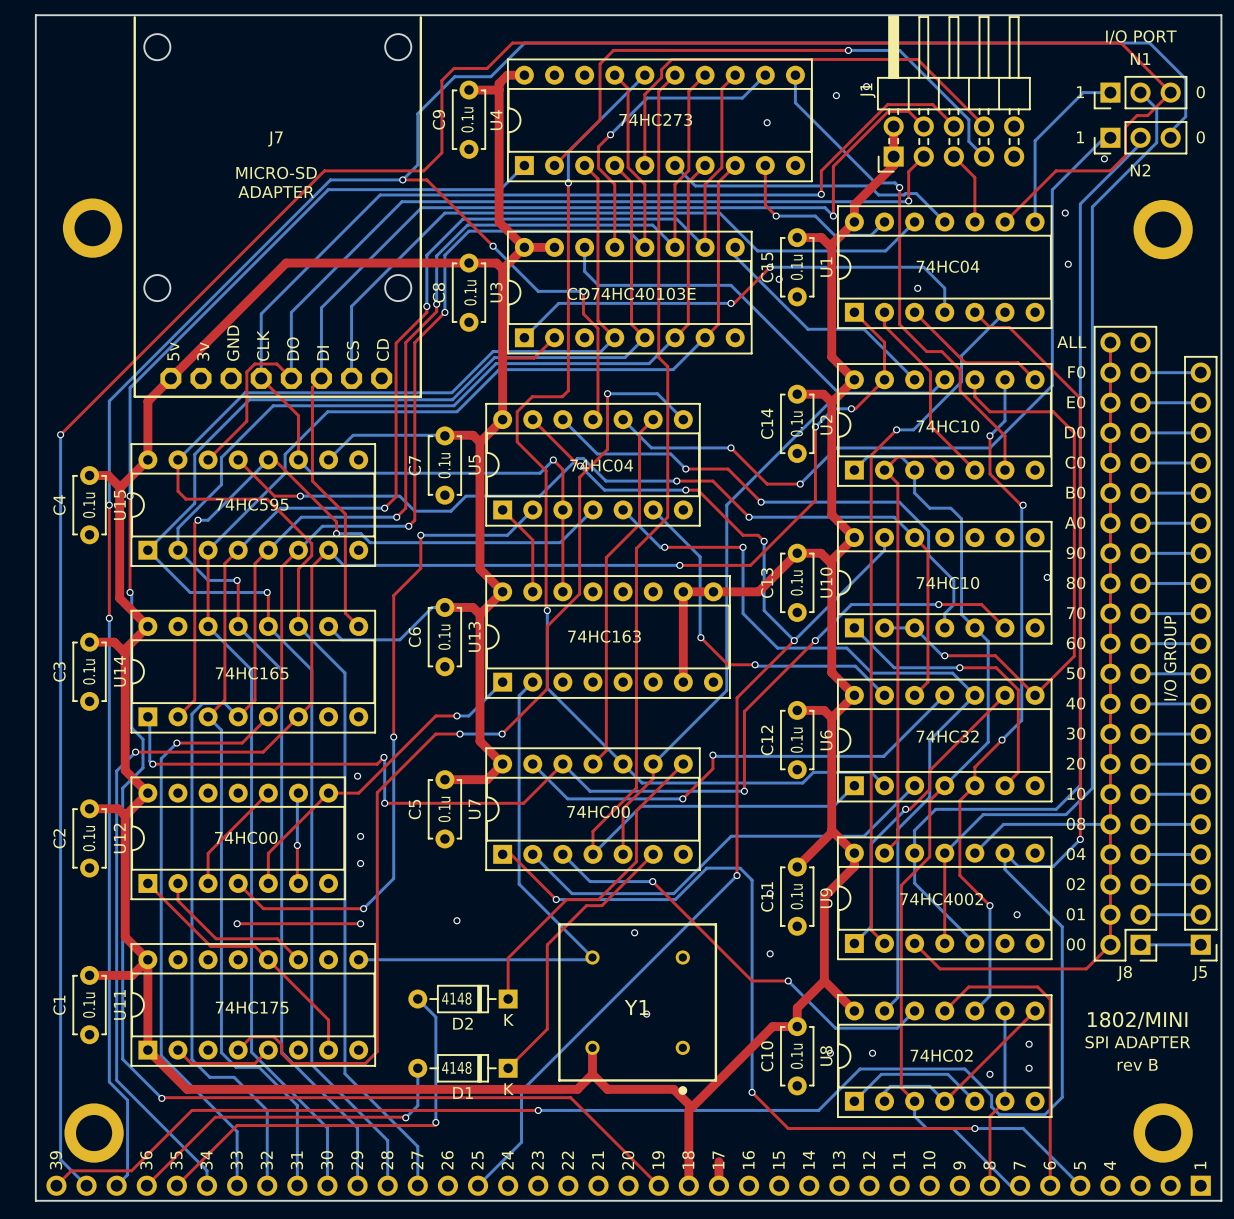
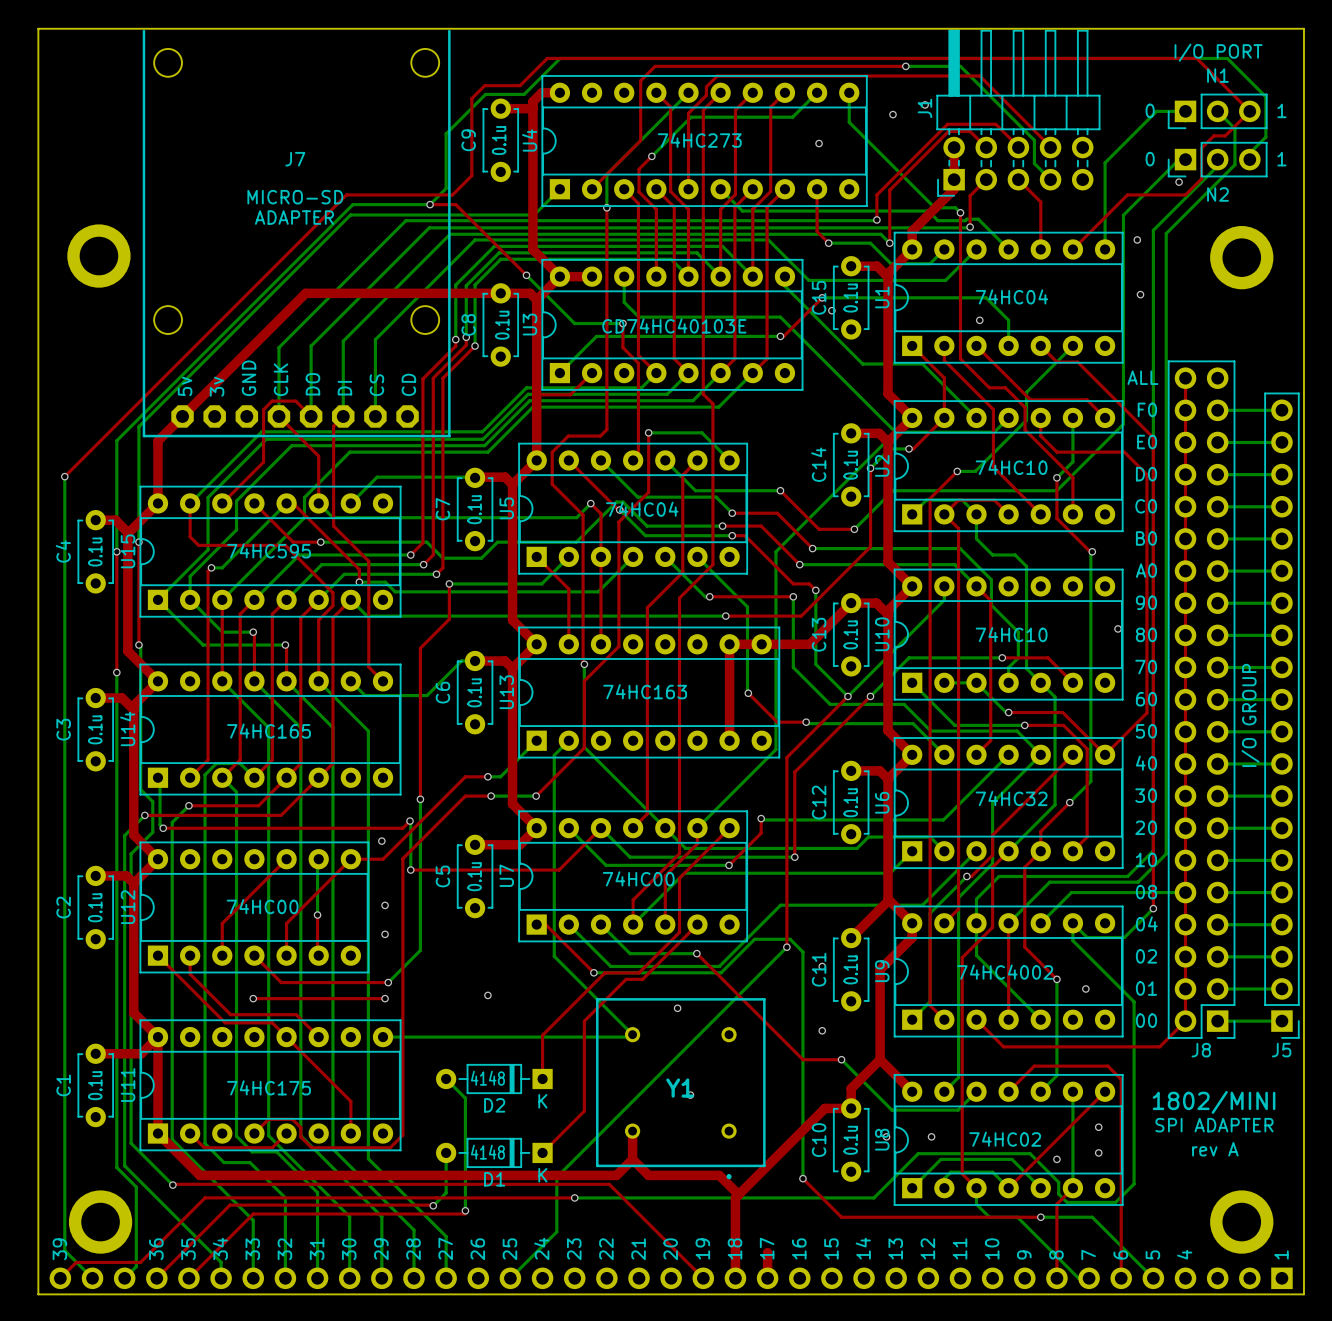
text: 1 (1080, 92) -> 0 (1150, 110)
text: 0 (1200, 92) -> 1 (1281, 110)
text: 1 (1080, 137) -> 0 (1150, 159)
text: 0 (1200, 137) -> 1 (1281, 159)
text: rev B (1137, 1064) -> rev A (1215, 1149)
drawing: [678, 1086, 688, 1095] -> none

